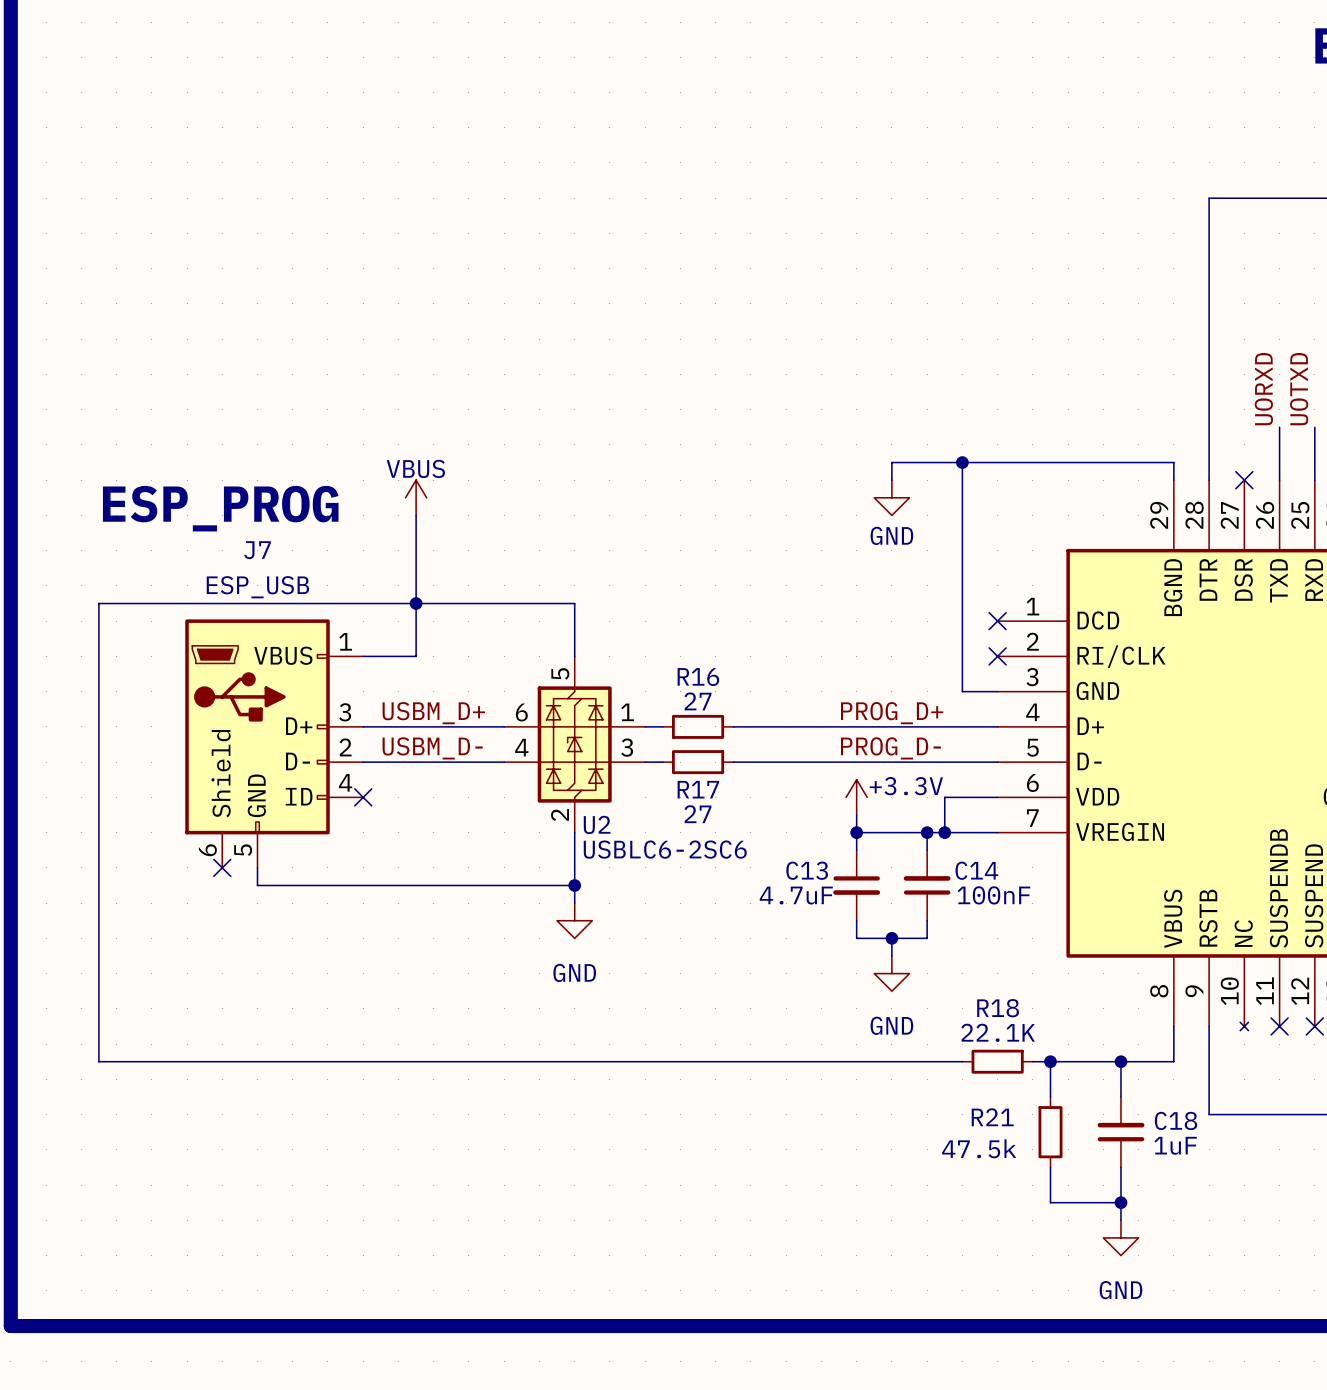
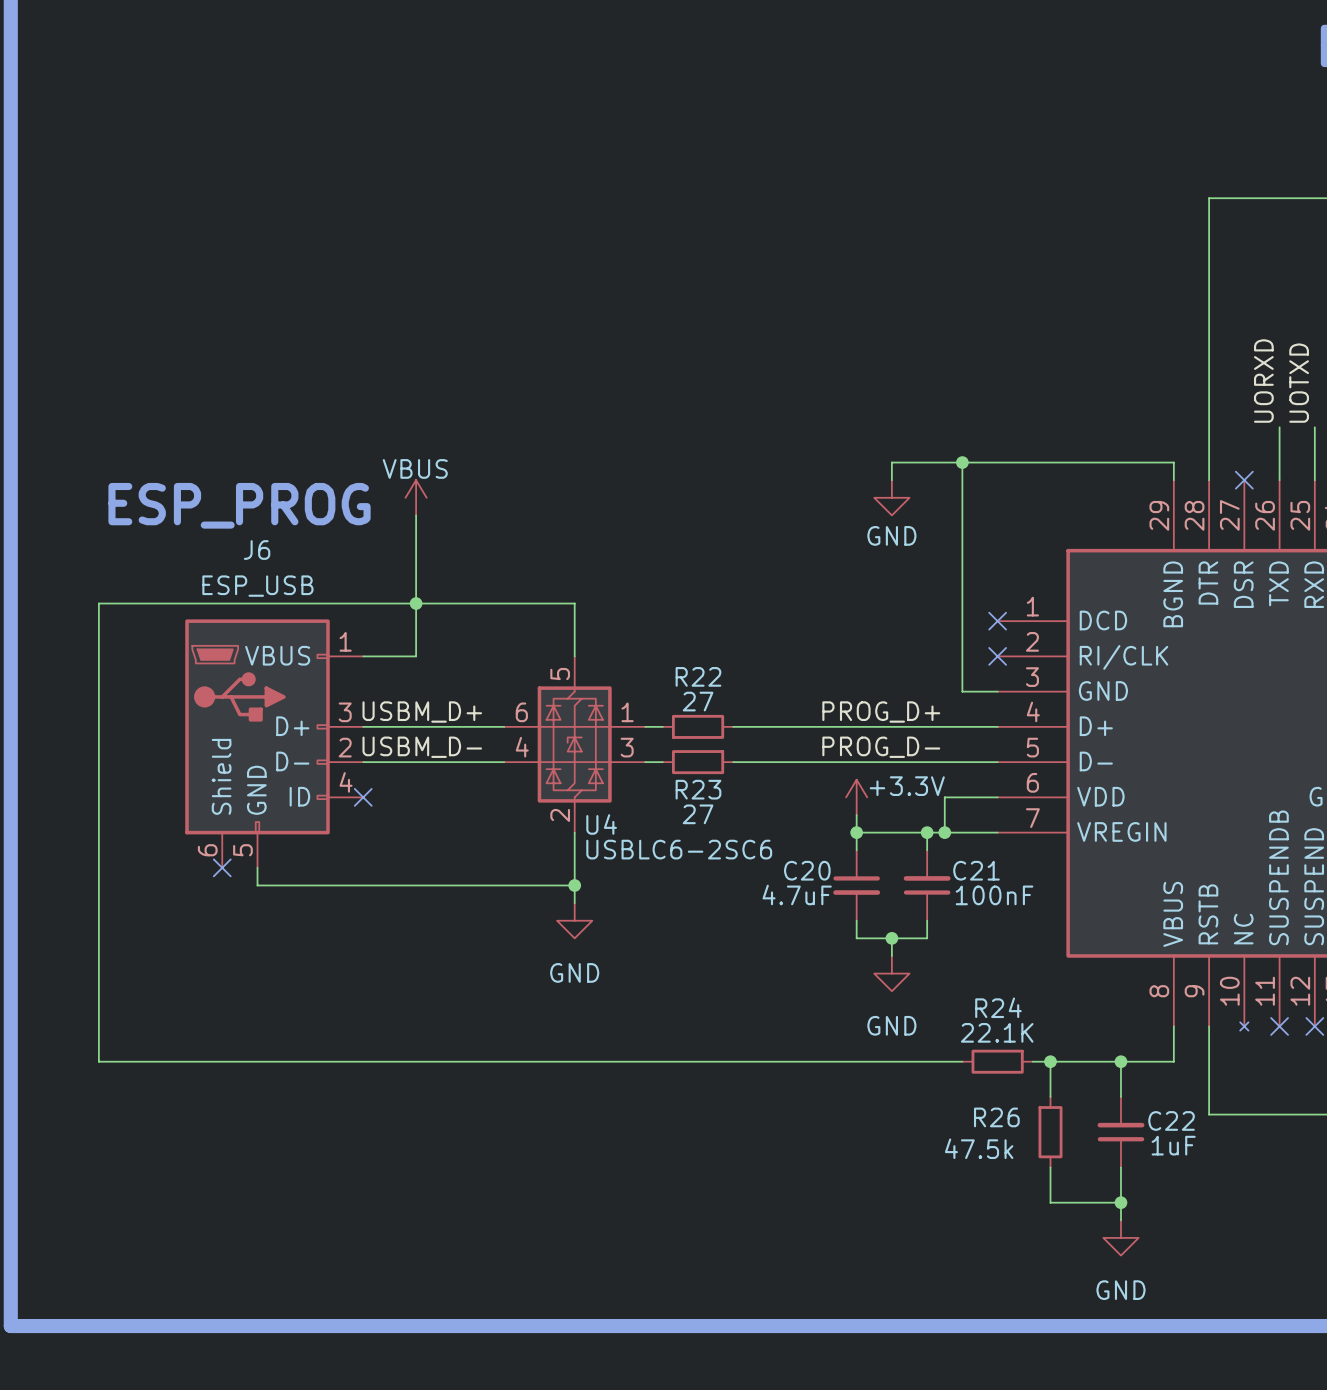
J7 name: J7 (257, 550) -> J6 (257, 550)
R16 name: R16 (698, 677) -> R22 (698, 676)
R17 name: R17 (698, 789) -> R23 (698, 789)
U2 name: U2 (597, 824) -> U4 (601, 824)
C13 name: C13 (807, 870) -> C20 (807, 870)
C14 name: C14 (976, 870) -> C21 (976, 870)
R18 name: R18 (998, 1008) -> R24 (998, 1007)
R21 name: R21 (992, 1117) -> R26 (996, 1117)
C18 name: C18 (1175, 1120) -> C22 (1171, 1120)

